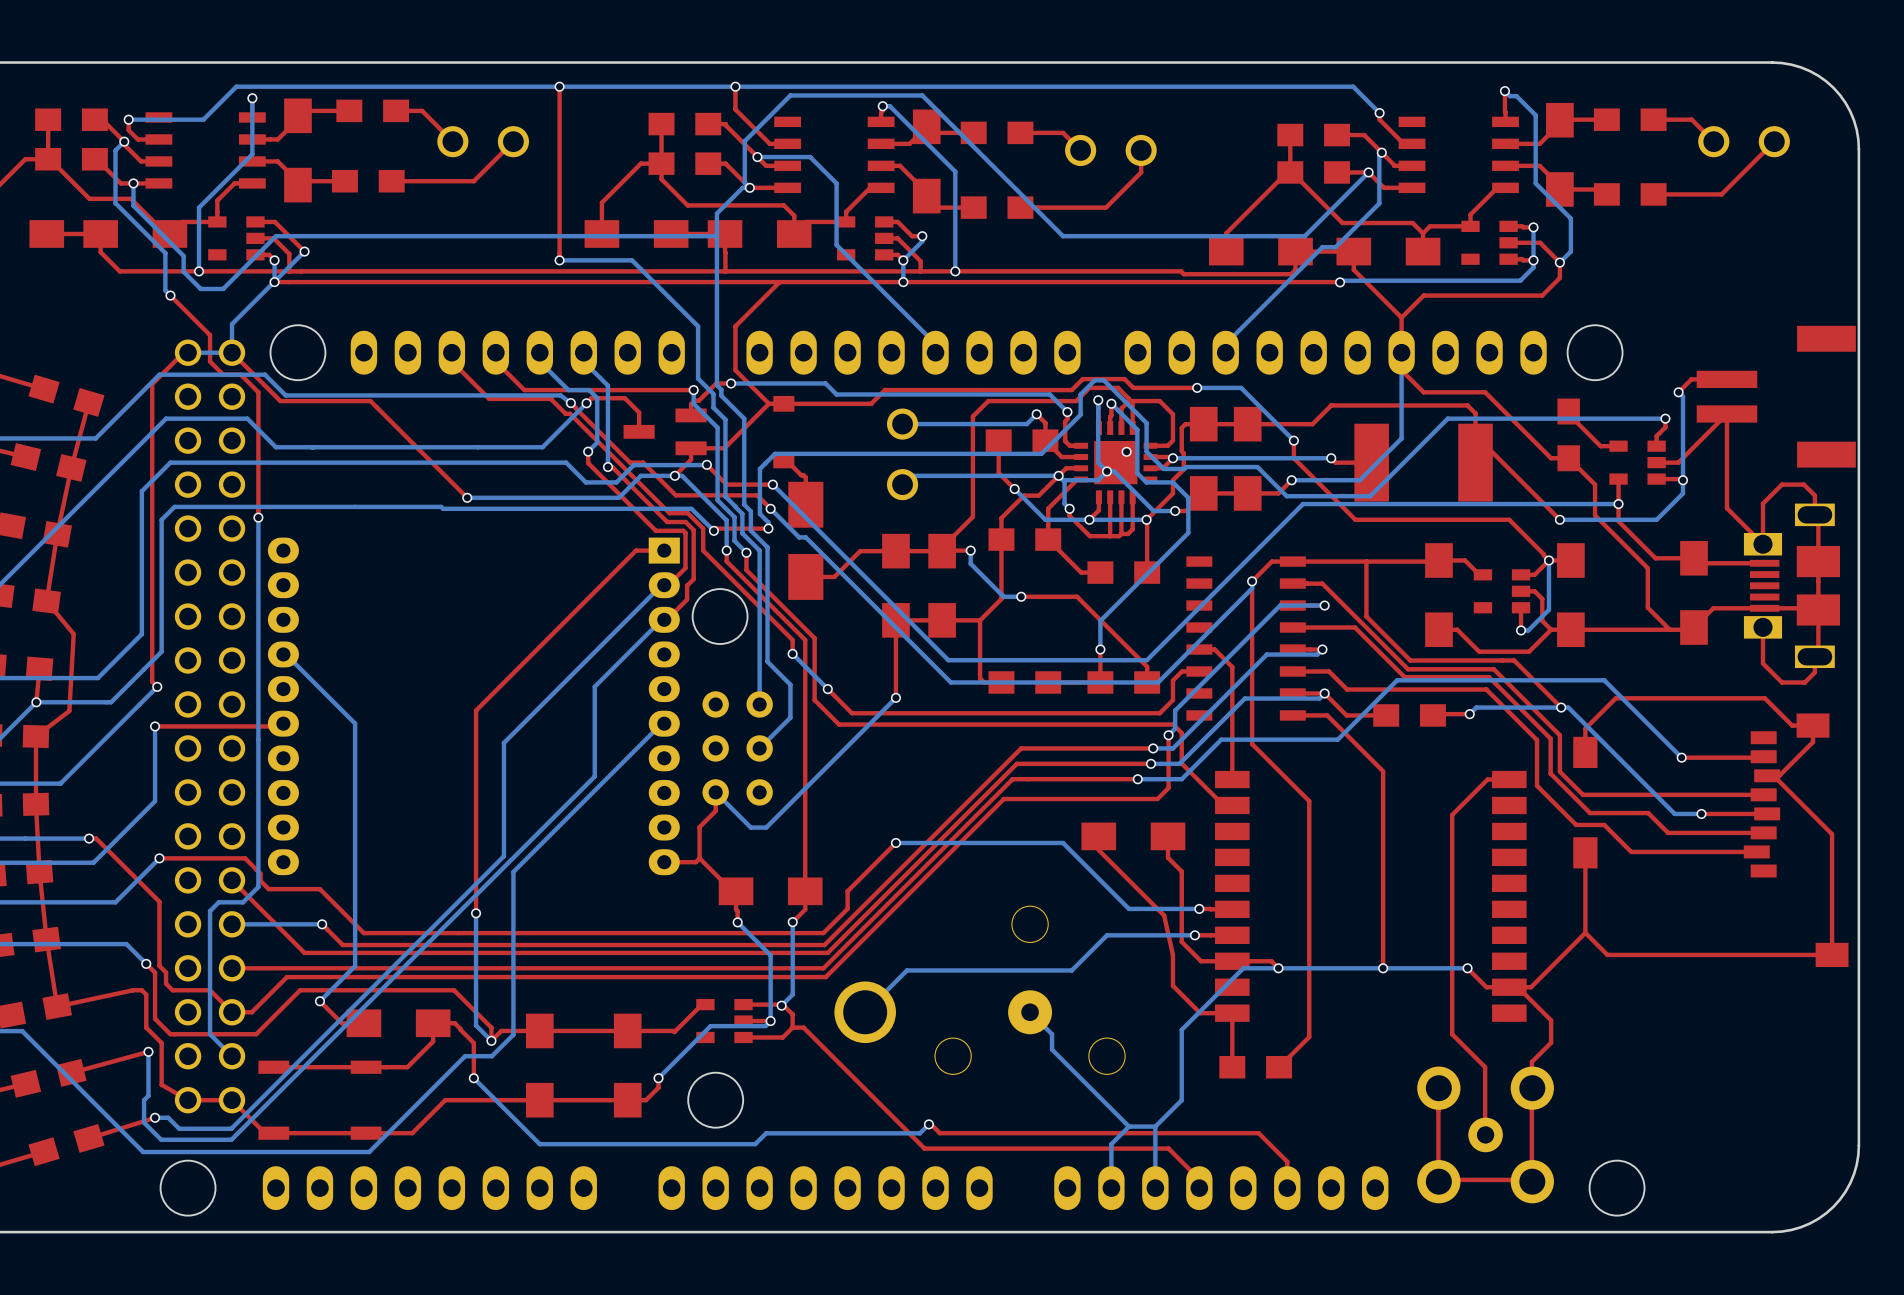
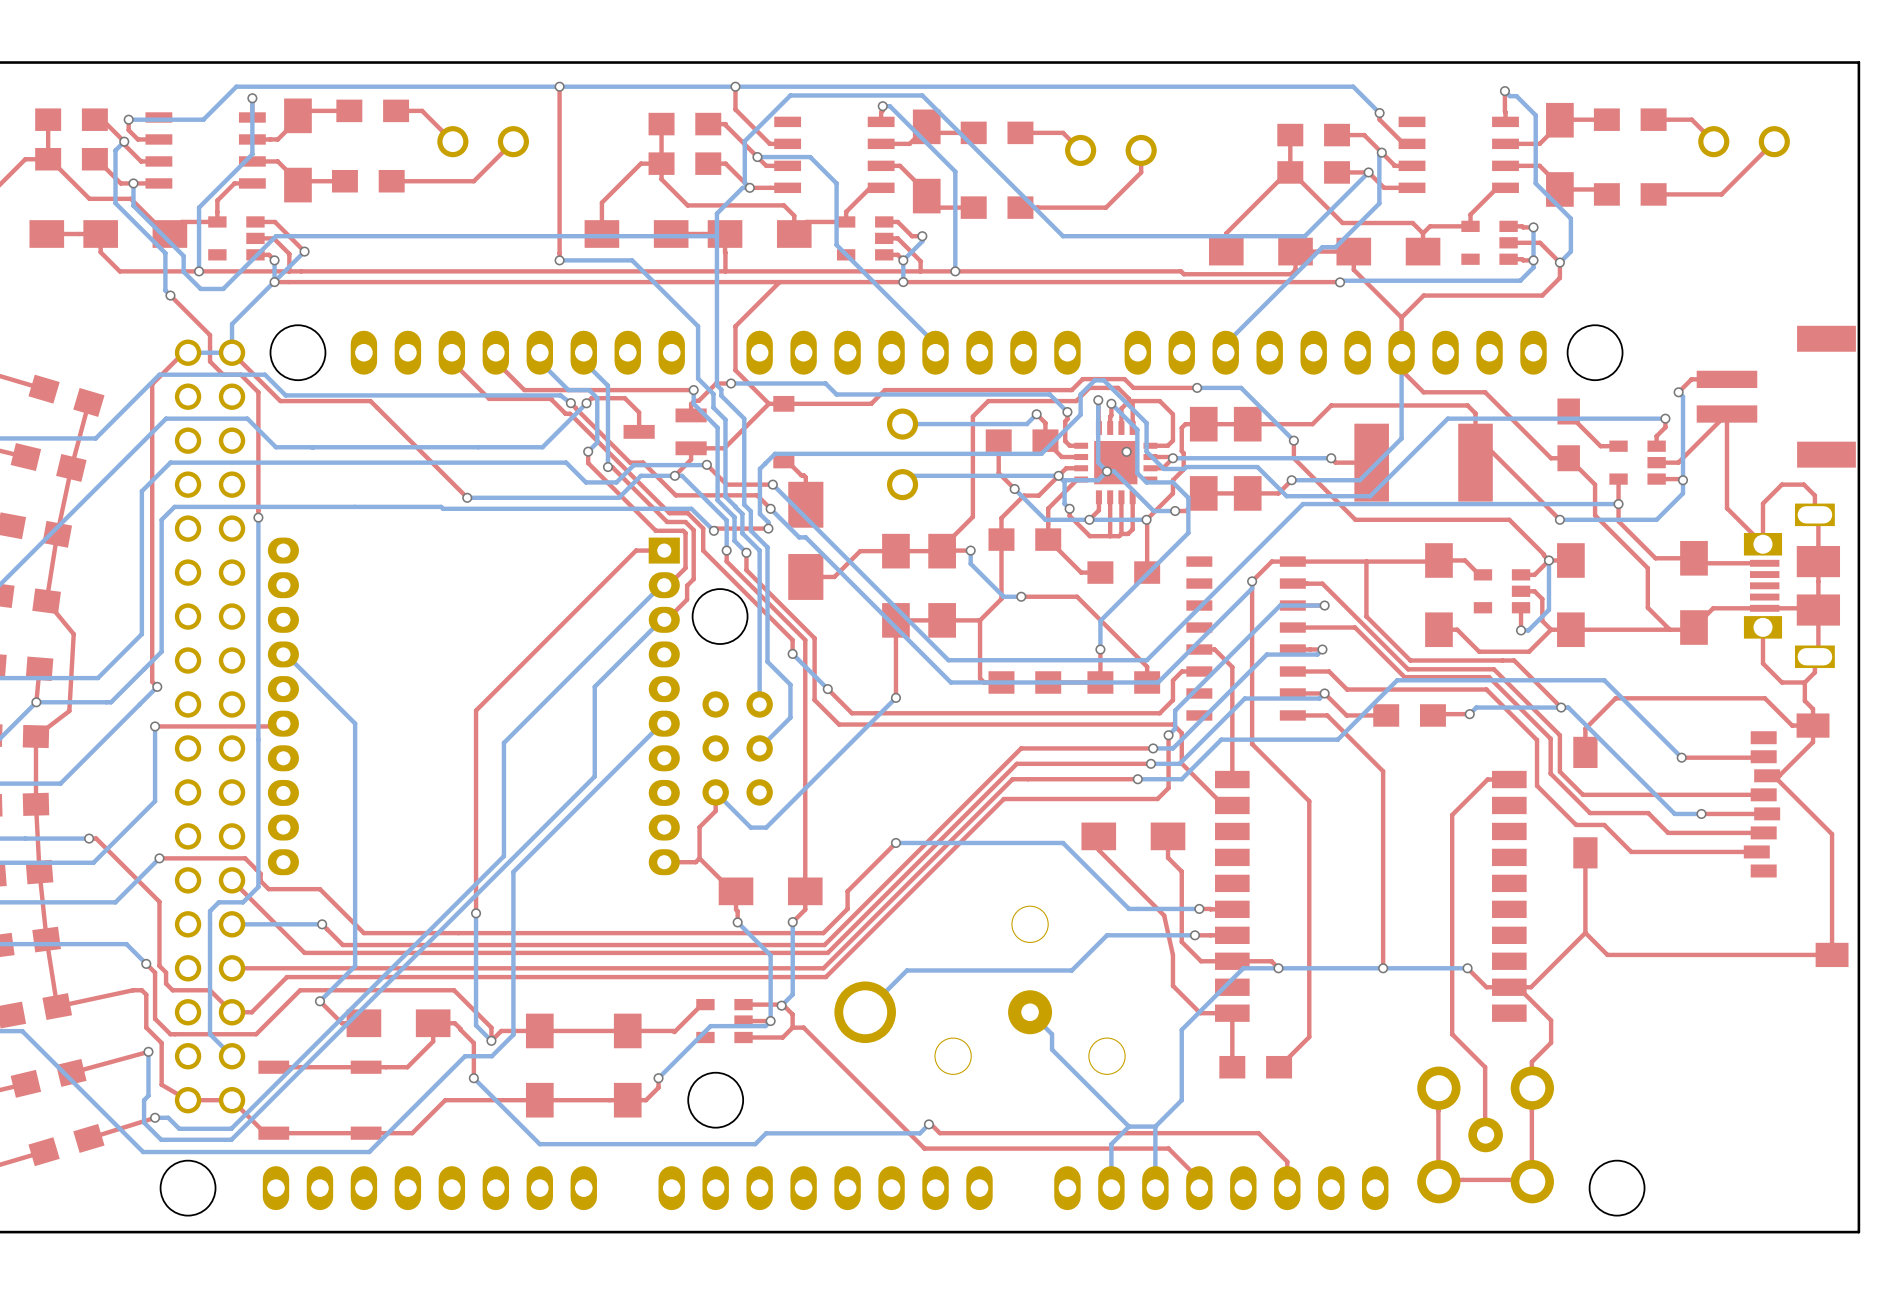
board edge: (1772, 62) (1800, 67) (1818, 75) (1833, 87) (1850, 111) (1856, 129) (1858, 149) -> (1772, 62) (1858, 62) (1858, 149)
top track: none -> (1804, 682) (1804, 700) (1813, 709) (1813, 725)
board edge: (1858, 1145) (1854, 1174) (1845, 1191) (1833, 1206) (1818, 1218) (1800, 1227) (1772, 1232) -> (1858, 1145) (1858, 1232) (1772, 1232)

